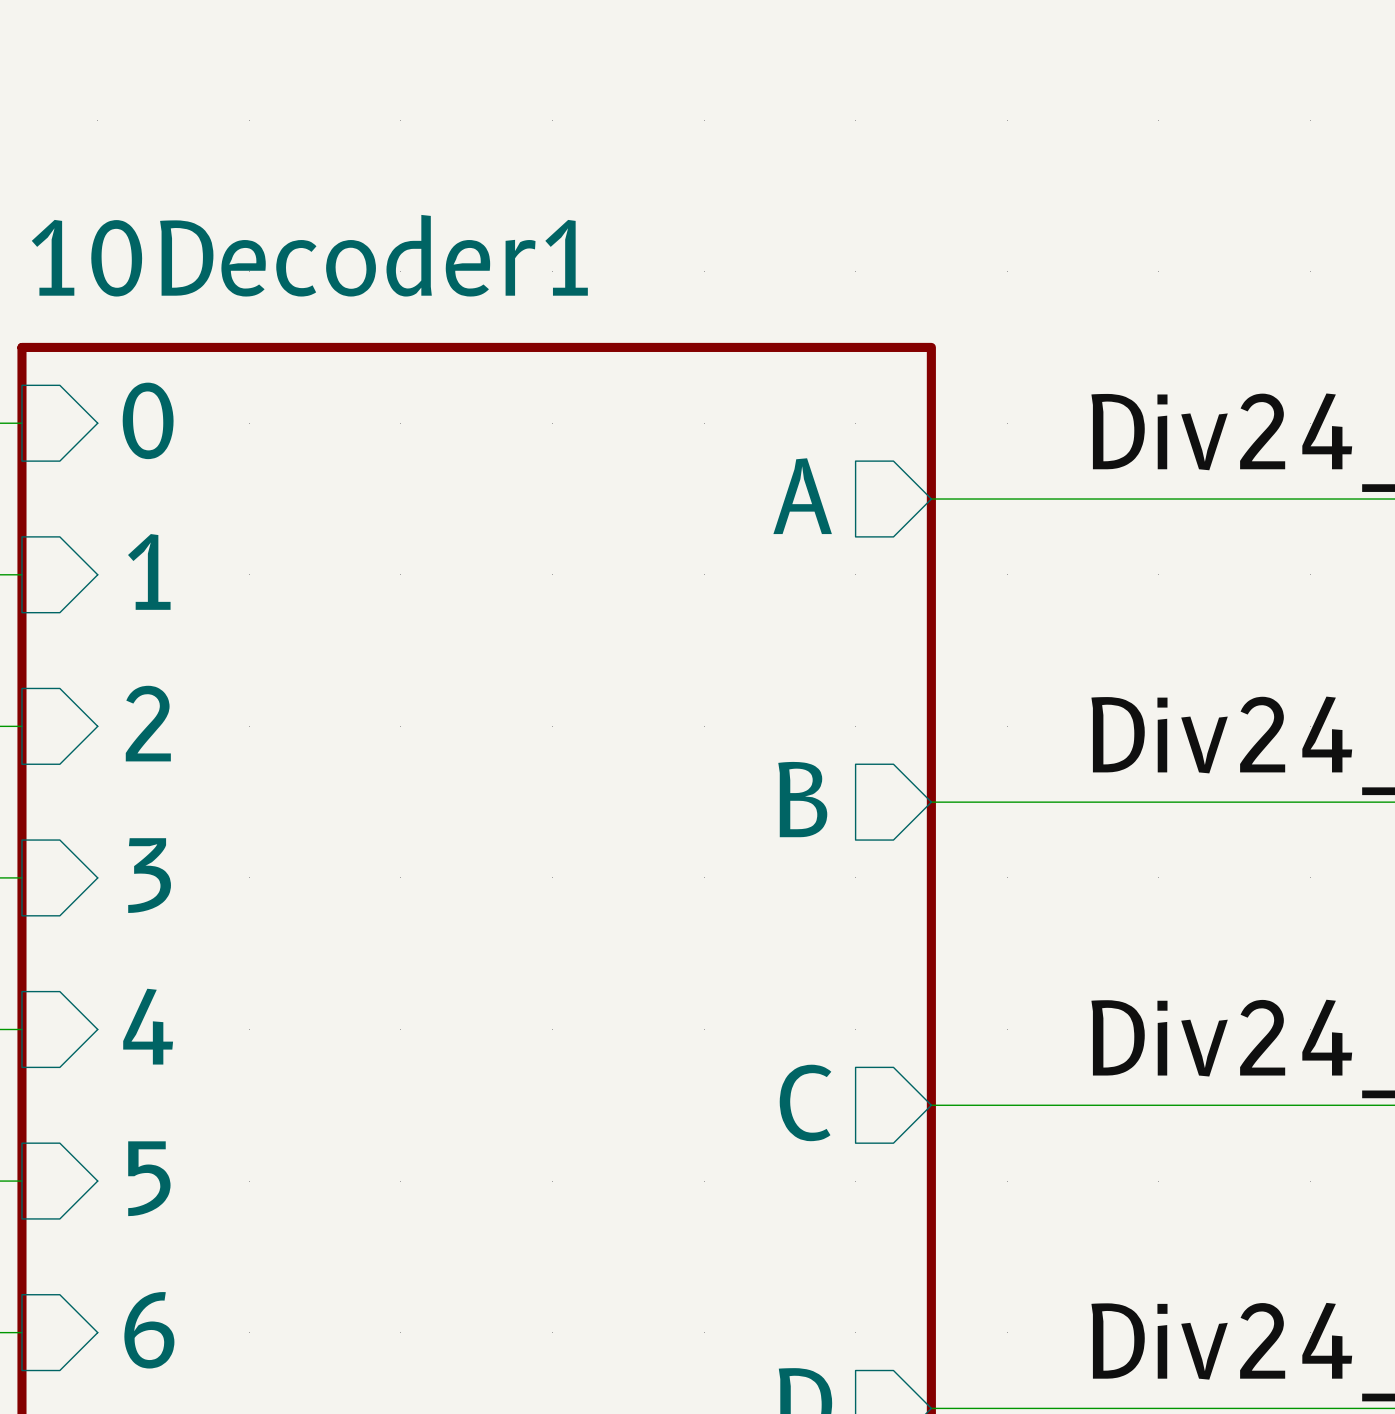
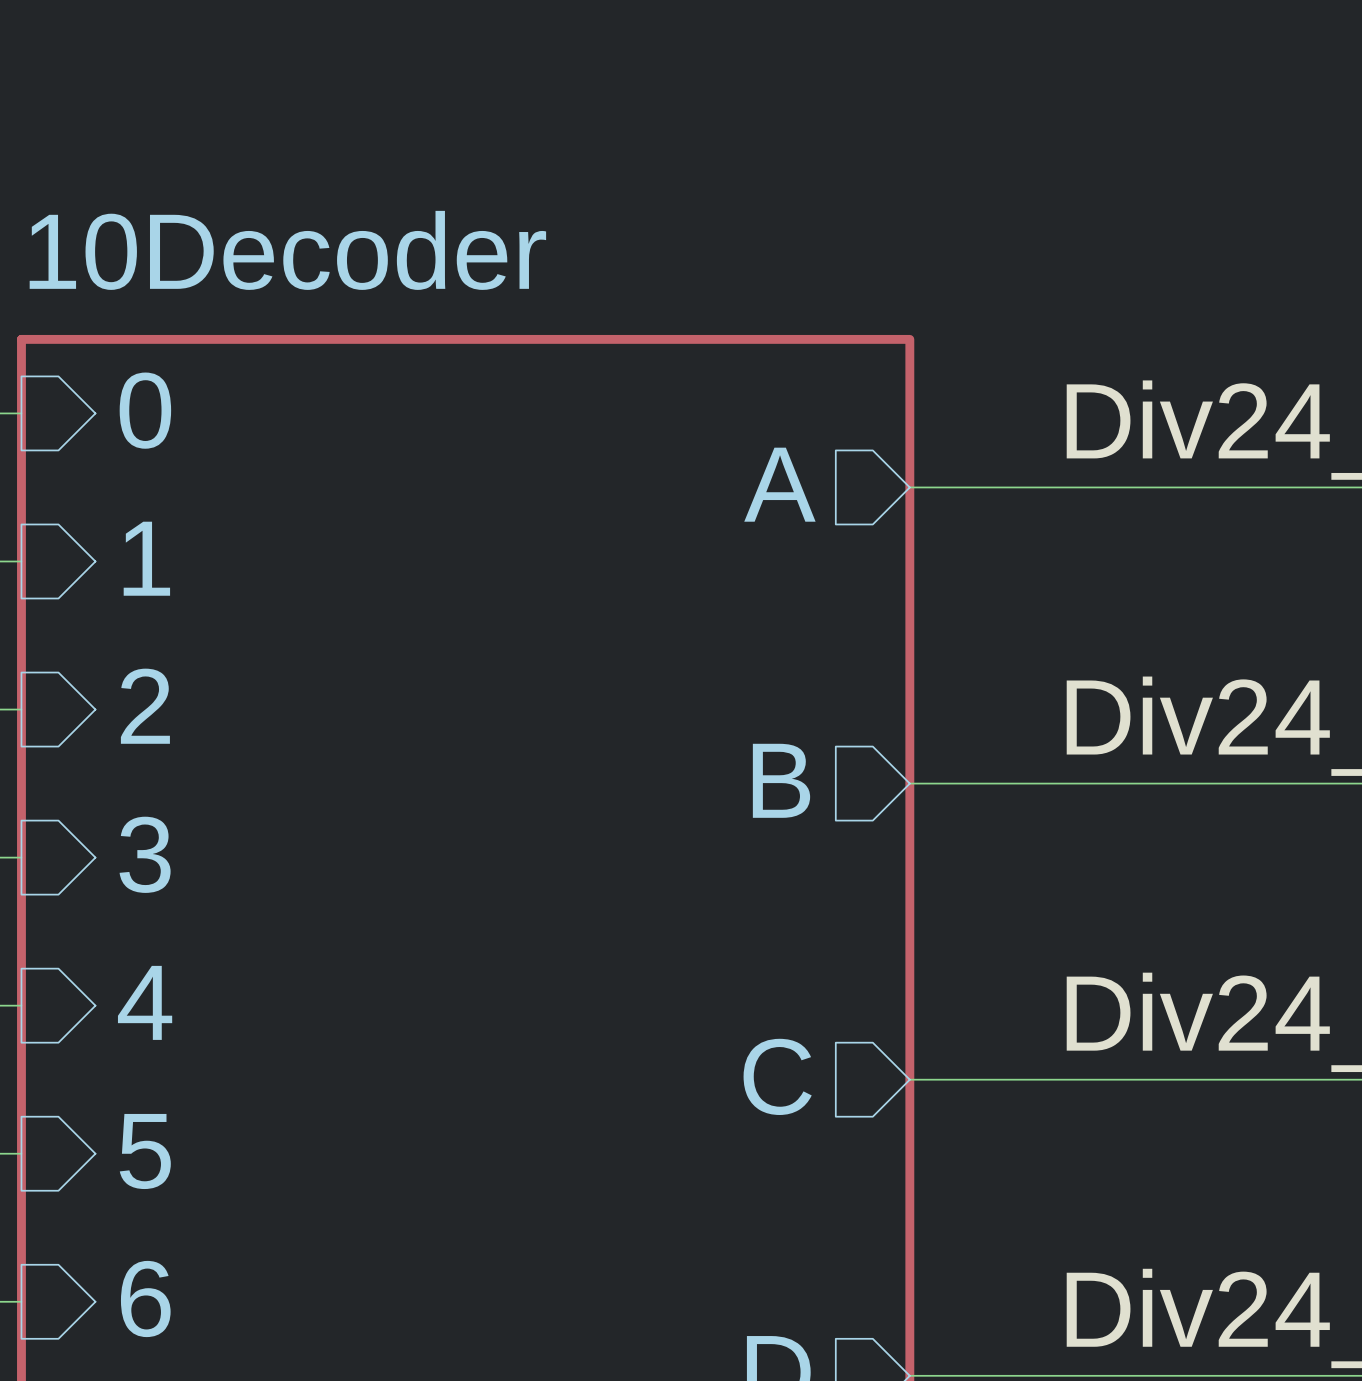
sheet 10Decoder1 name: 10Decoder1 (309, 255) -> 10Decoder (287, 250)

